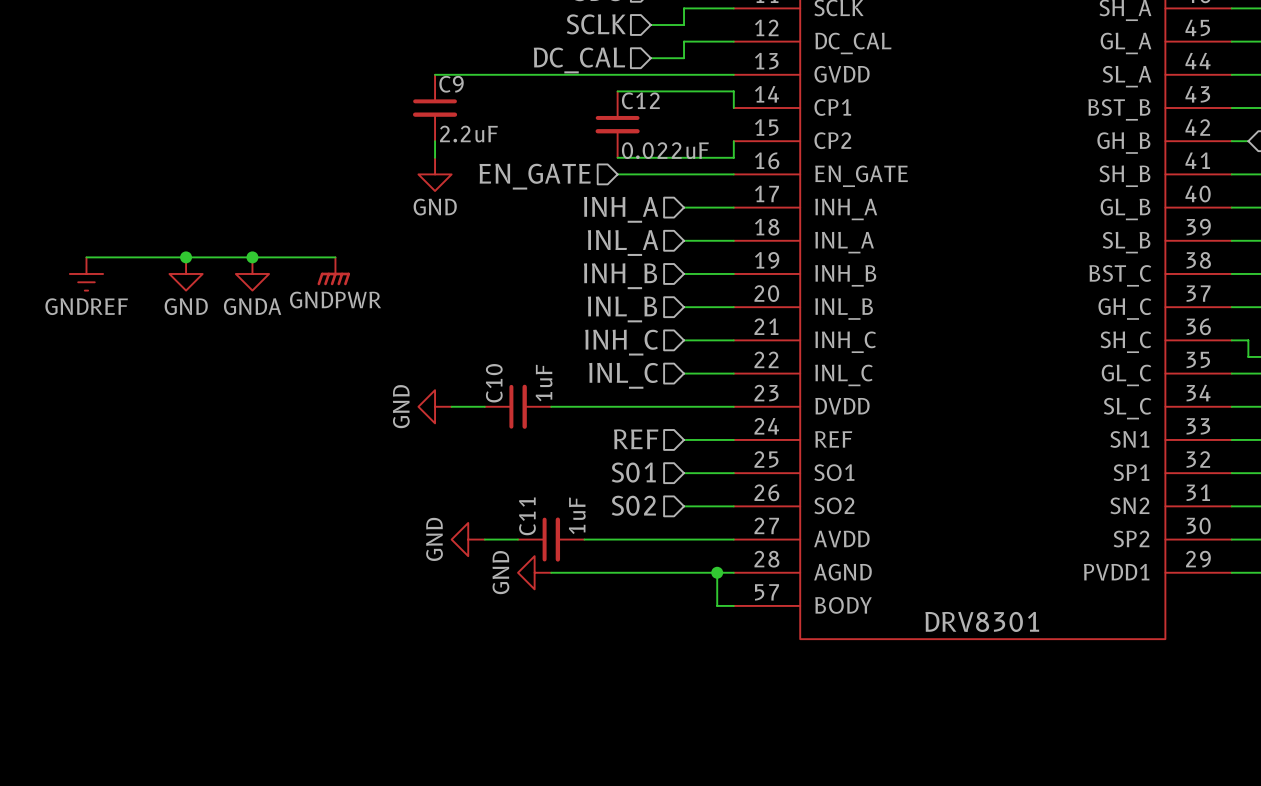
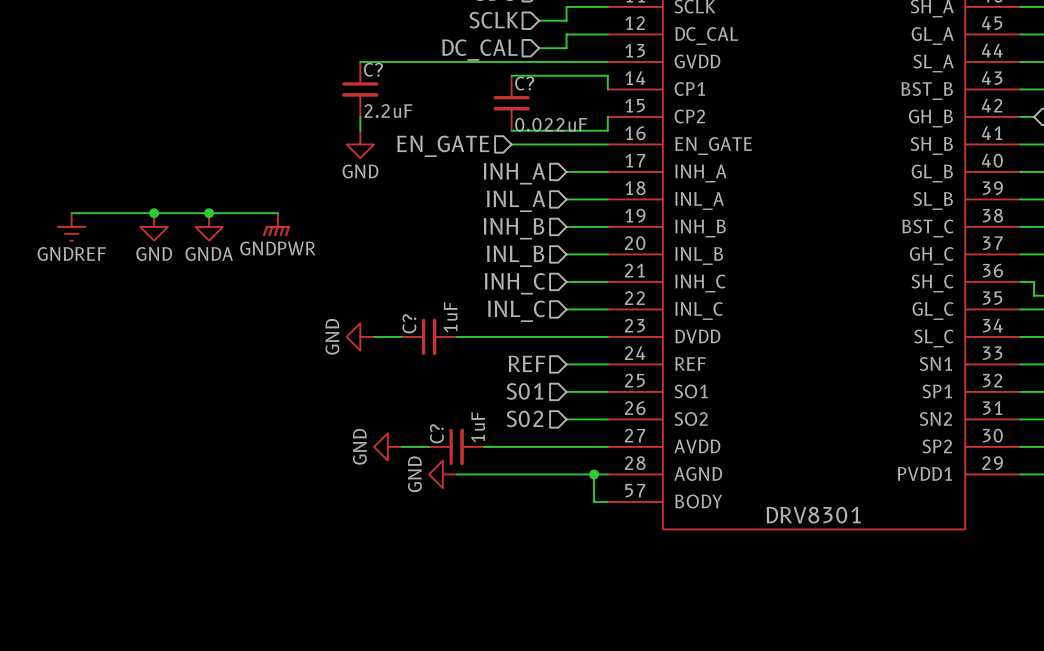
C9 name: C9 (451, 84) -> C? (373, 69)
C12 name: C12 (640, 100) -> C? (524, 83)
C10 name: C10 (494, 383) -> C? (409, 323)
C11 name: C11 (527, 516) -> C? (436, 433)

